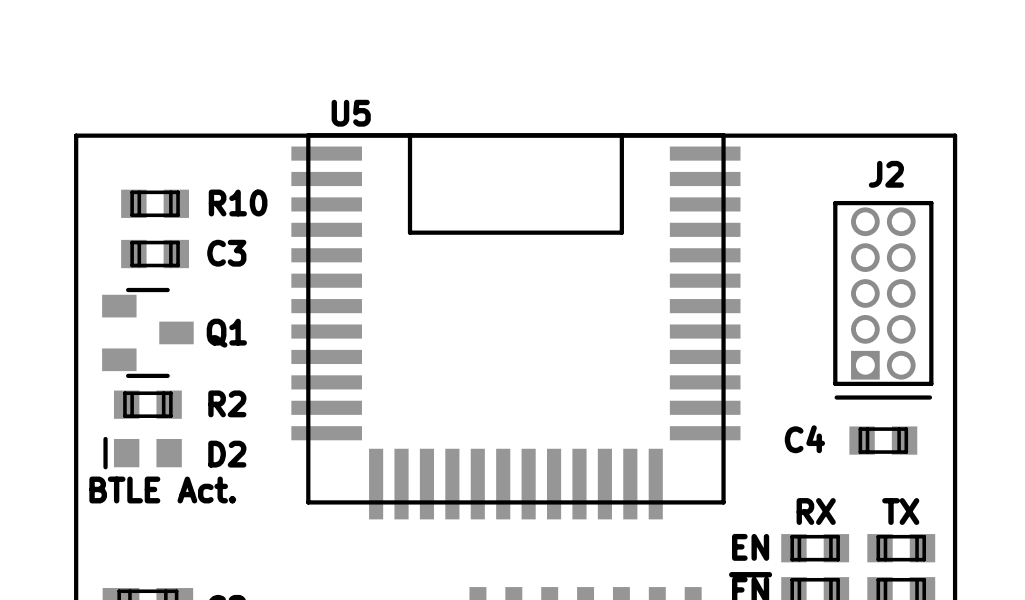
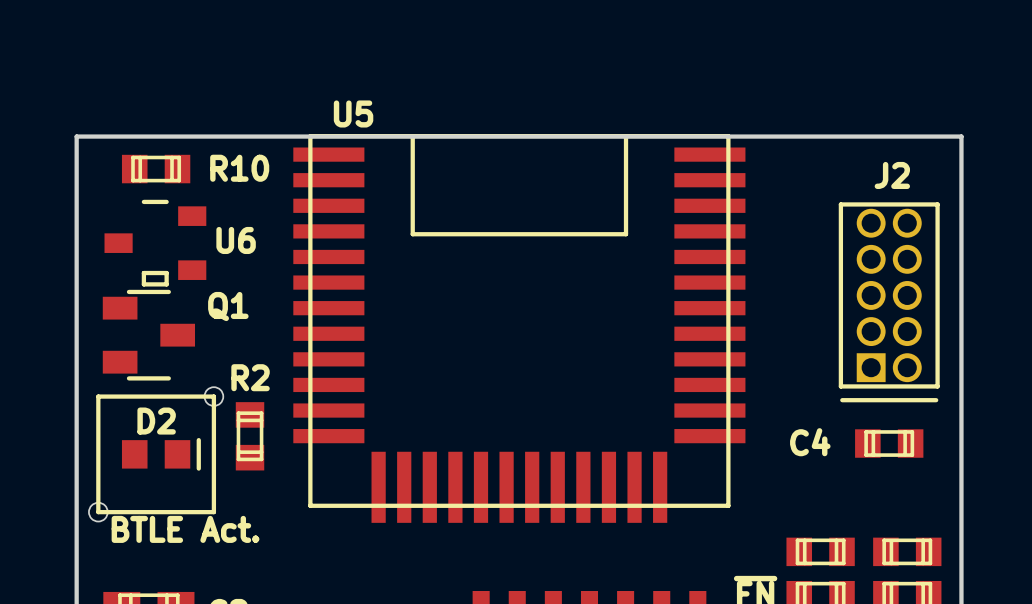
R10 position: (155, 203) -> (156, 169)
U6: none -> (155, 243)
C3: (155, 254) -> none
Q1 name position: Q1 (226, 333) -> Q1 (228, 306)
R2 rotation: 0° (147, 404) -> 90° counterclockwise (250, 436)
R2 position: (147, 404) -> (250, 436)
part: none -> (156, 454)
D2 rotation: 0° (142, 453) -> 180° (161, 454)
D2 name position: D2 (227, 454) -> D2 (156, 421)
text position: BTLE Act. (162, 489) -> BTLE Act. (185, 529)
text: RX (816, 511) -> none
text: TX (900, 511) -> none
text: EN (750, 547) -> none

